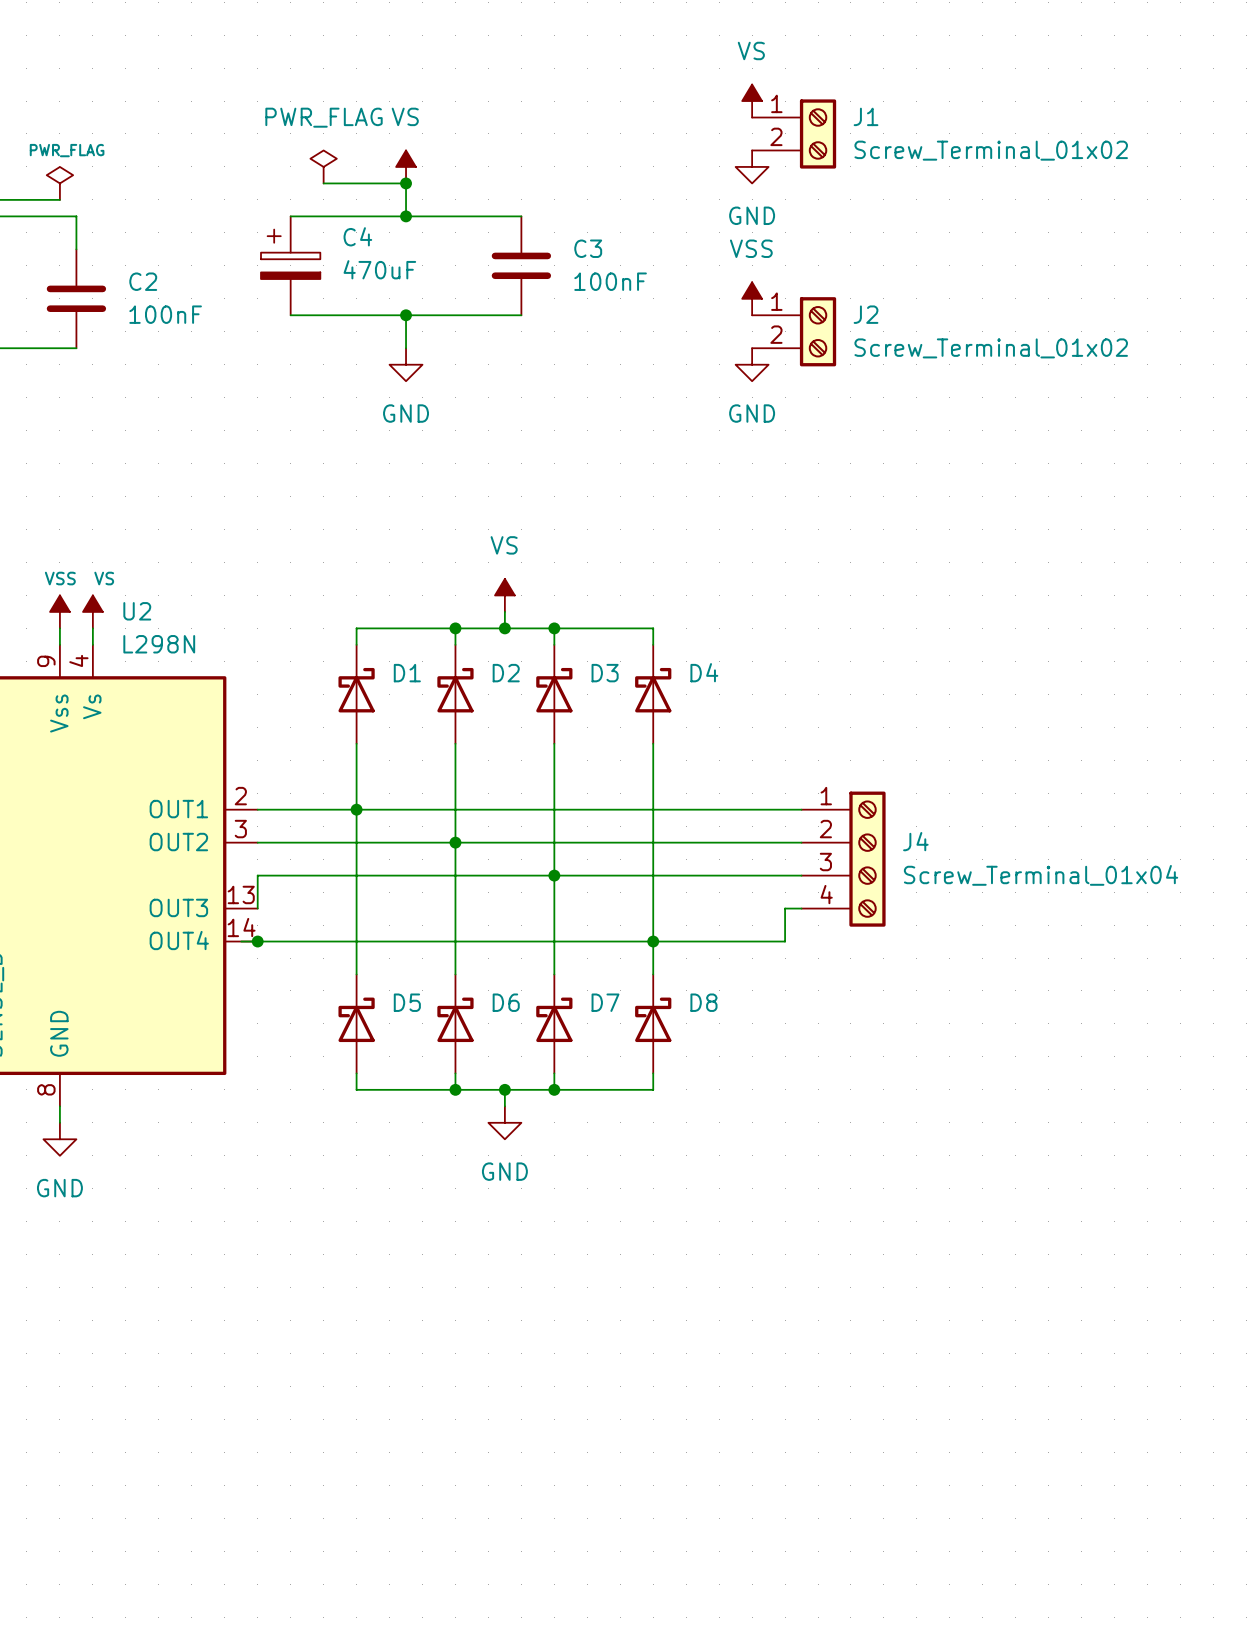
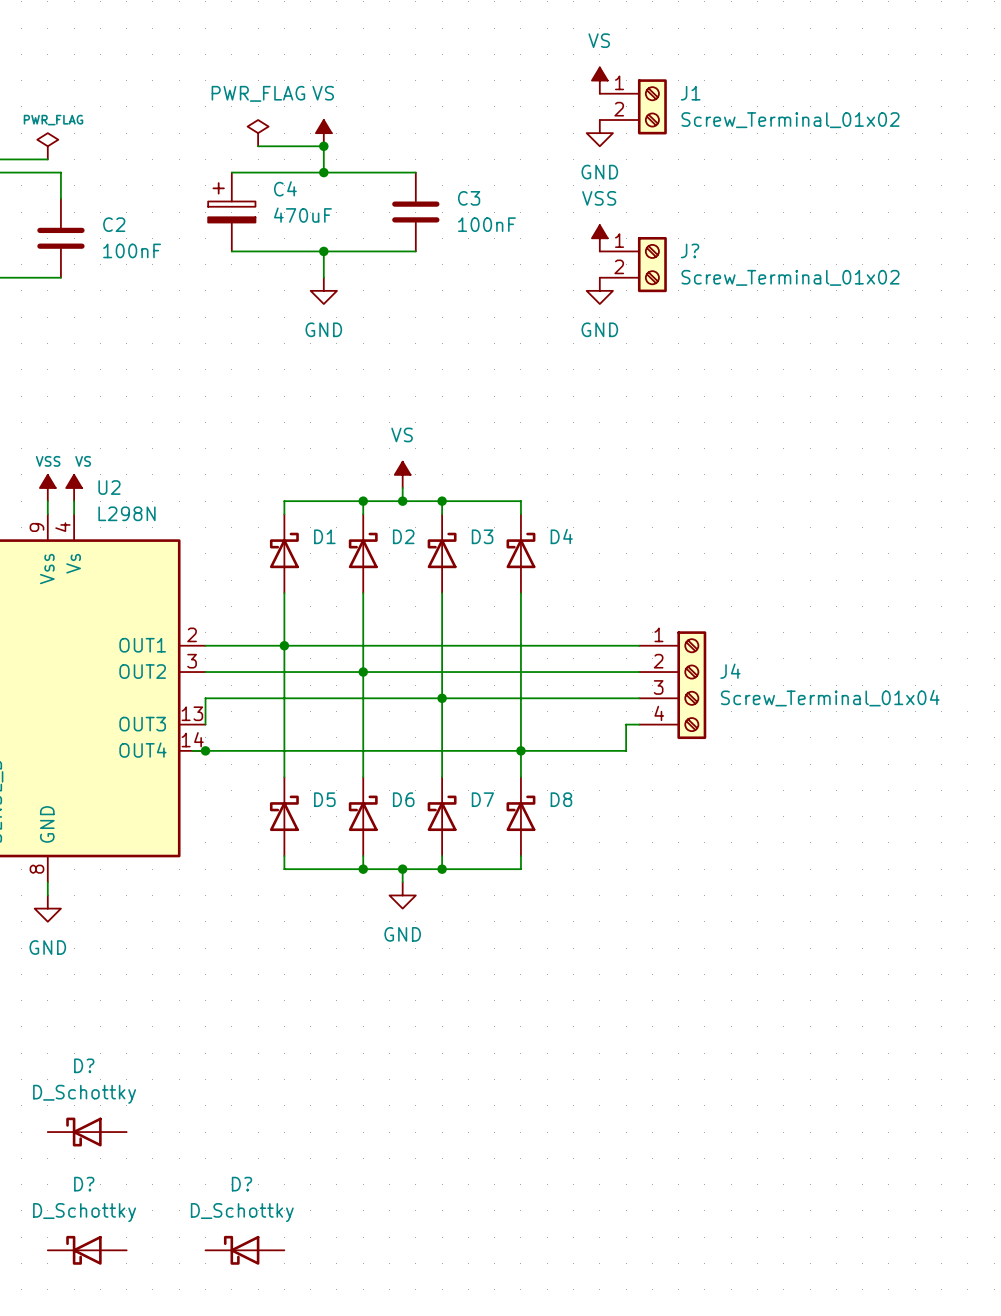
J2 name: J2 (866, 314) -> J? (690, 250)
D?: none -> D_Schottky (87, 1132)
D?: none -> D_Schottky (87, 1250)
D?: none -> D_Schottky (244, 1250)

